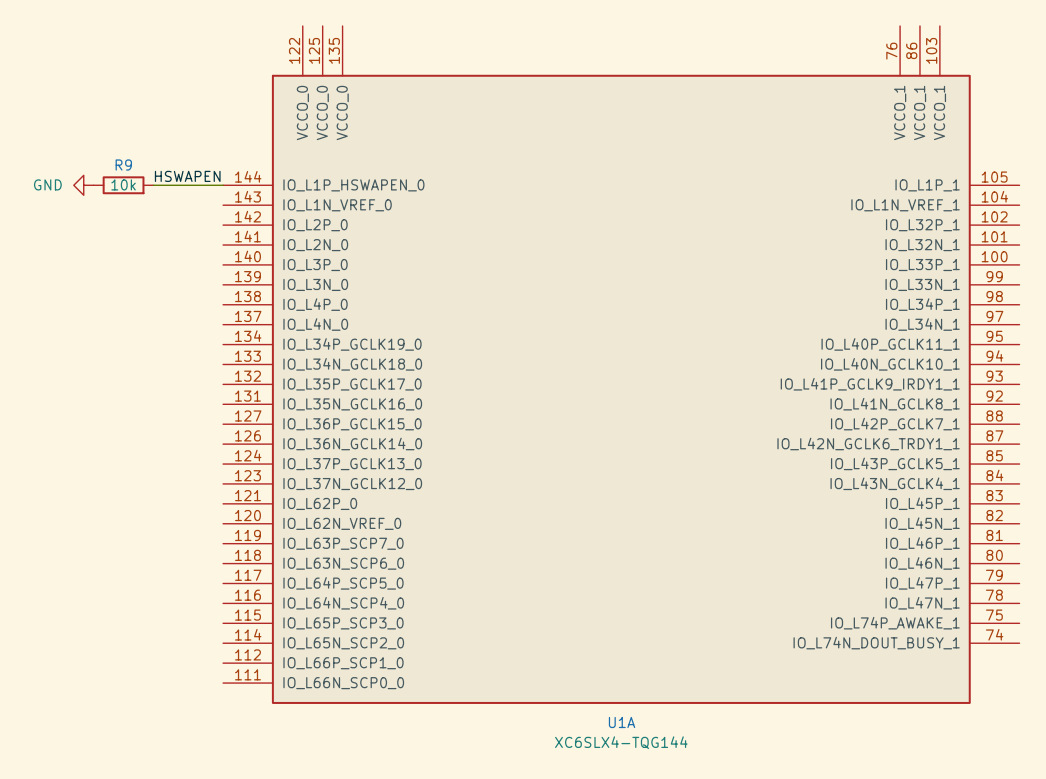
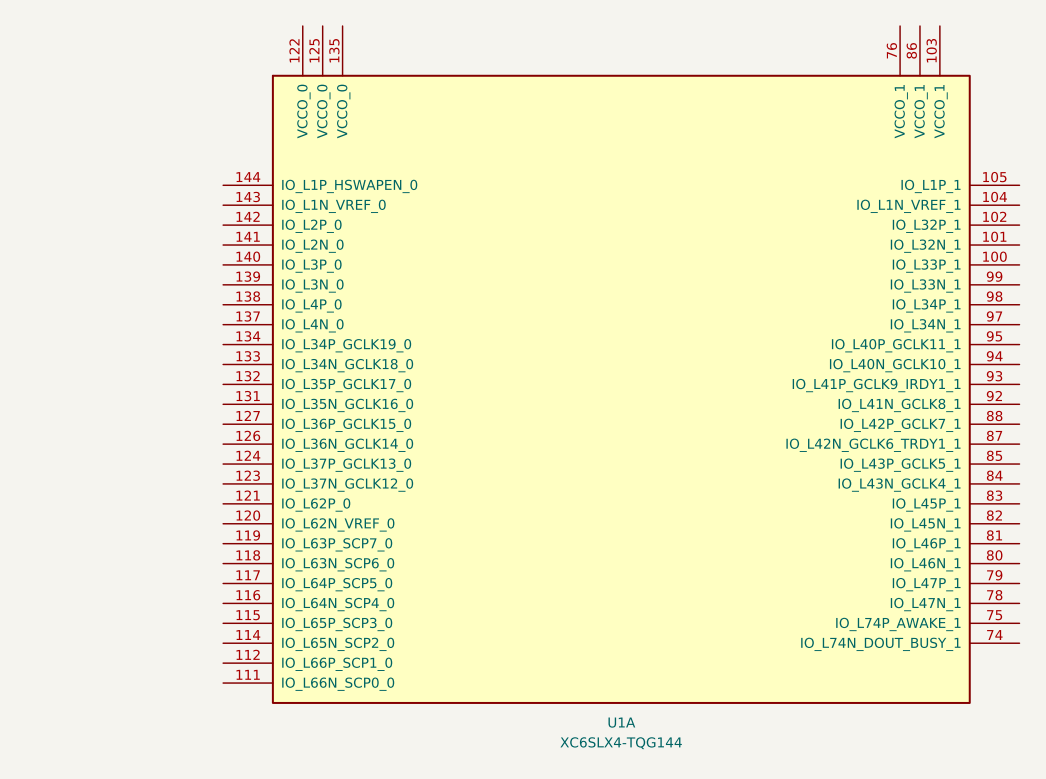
label: HSWAPEN (187, 176) -> none
power symbol: GND (83, 185) -> none
R9: 10k (123, 185) -> none
wire: (153, 185) (223, 185) -> none

